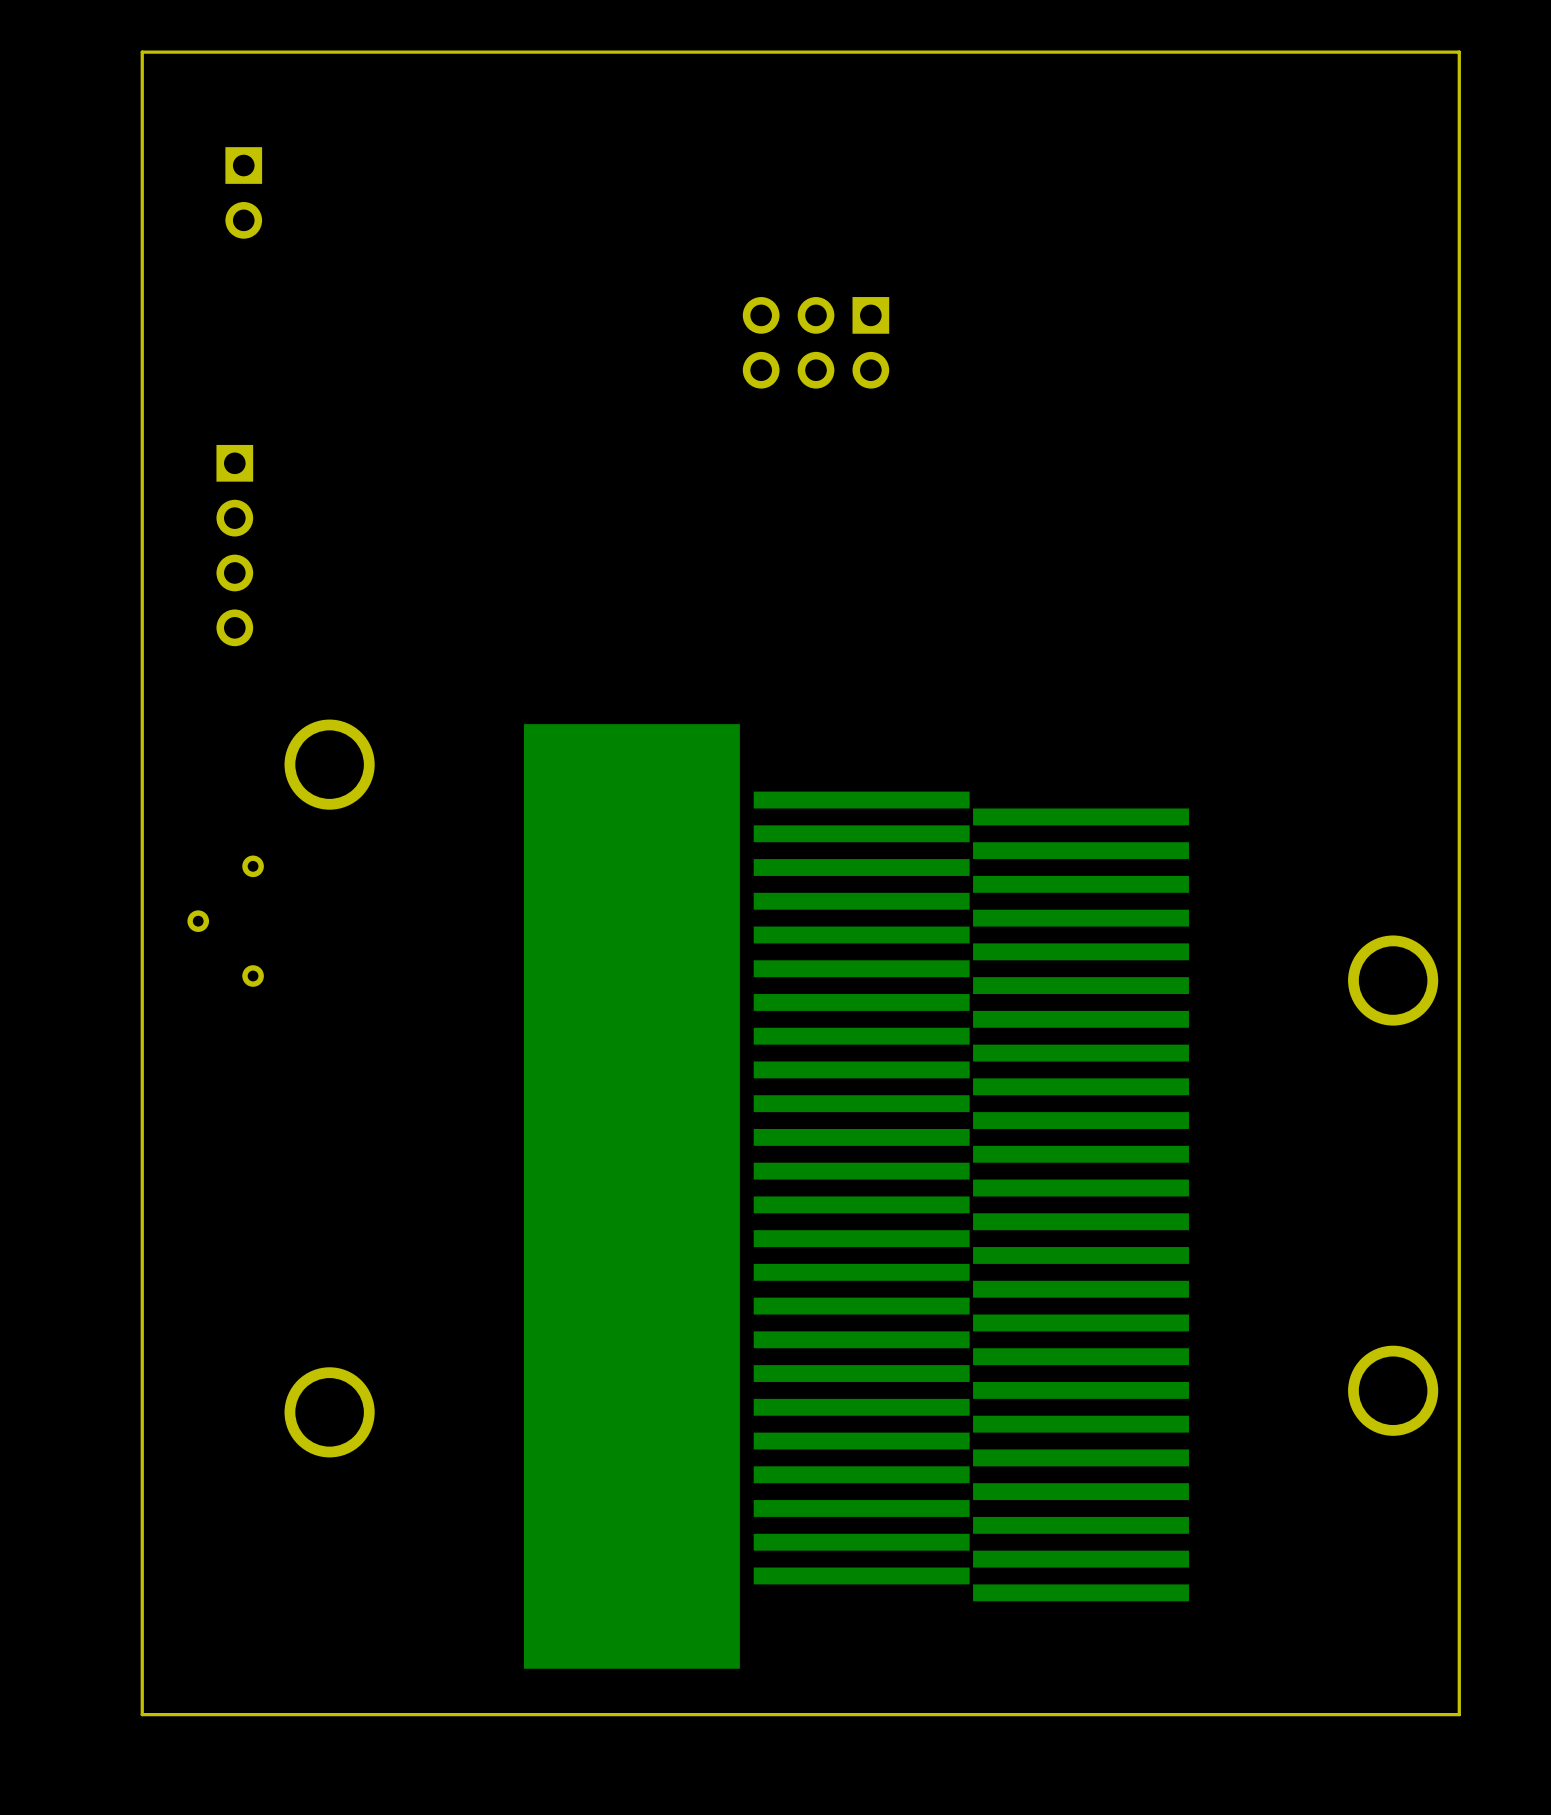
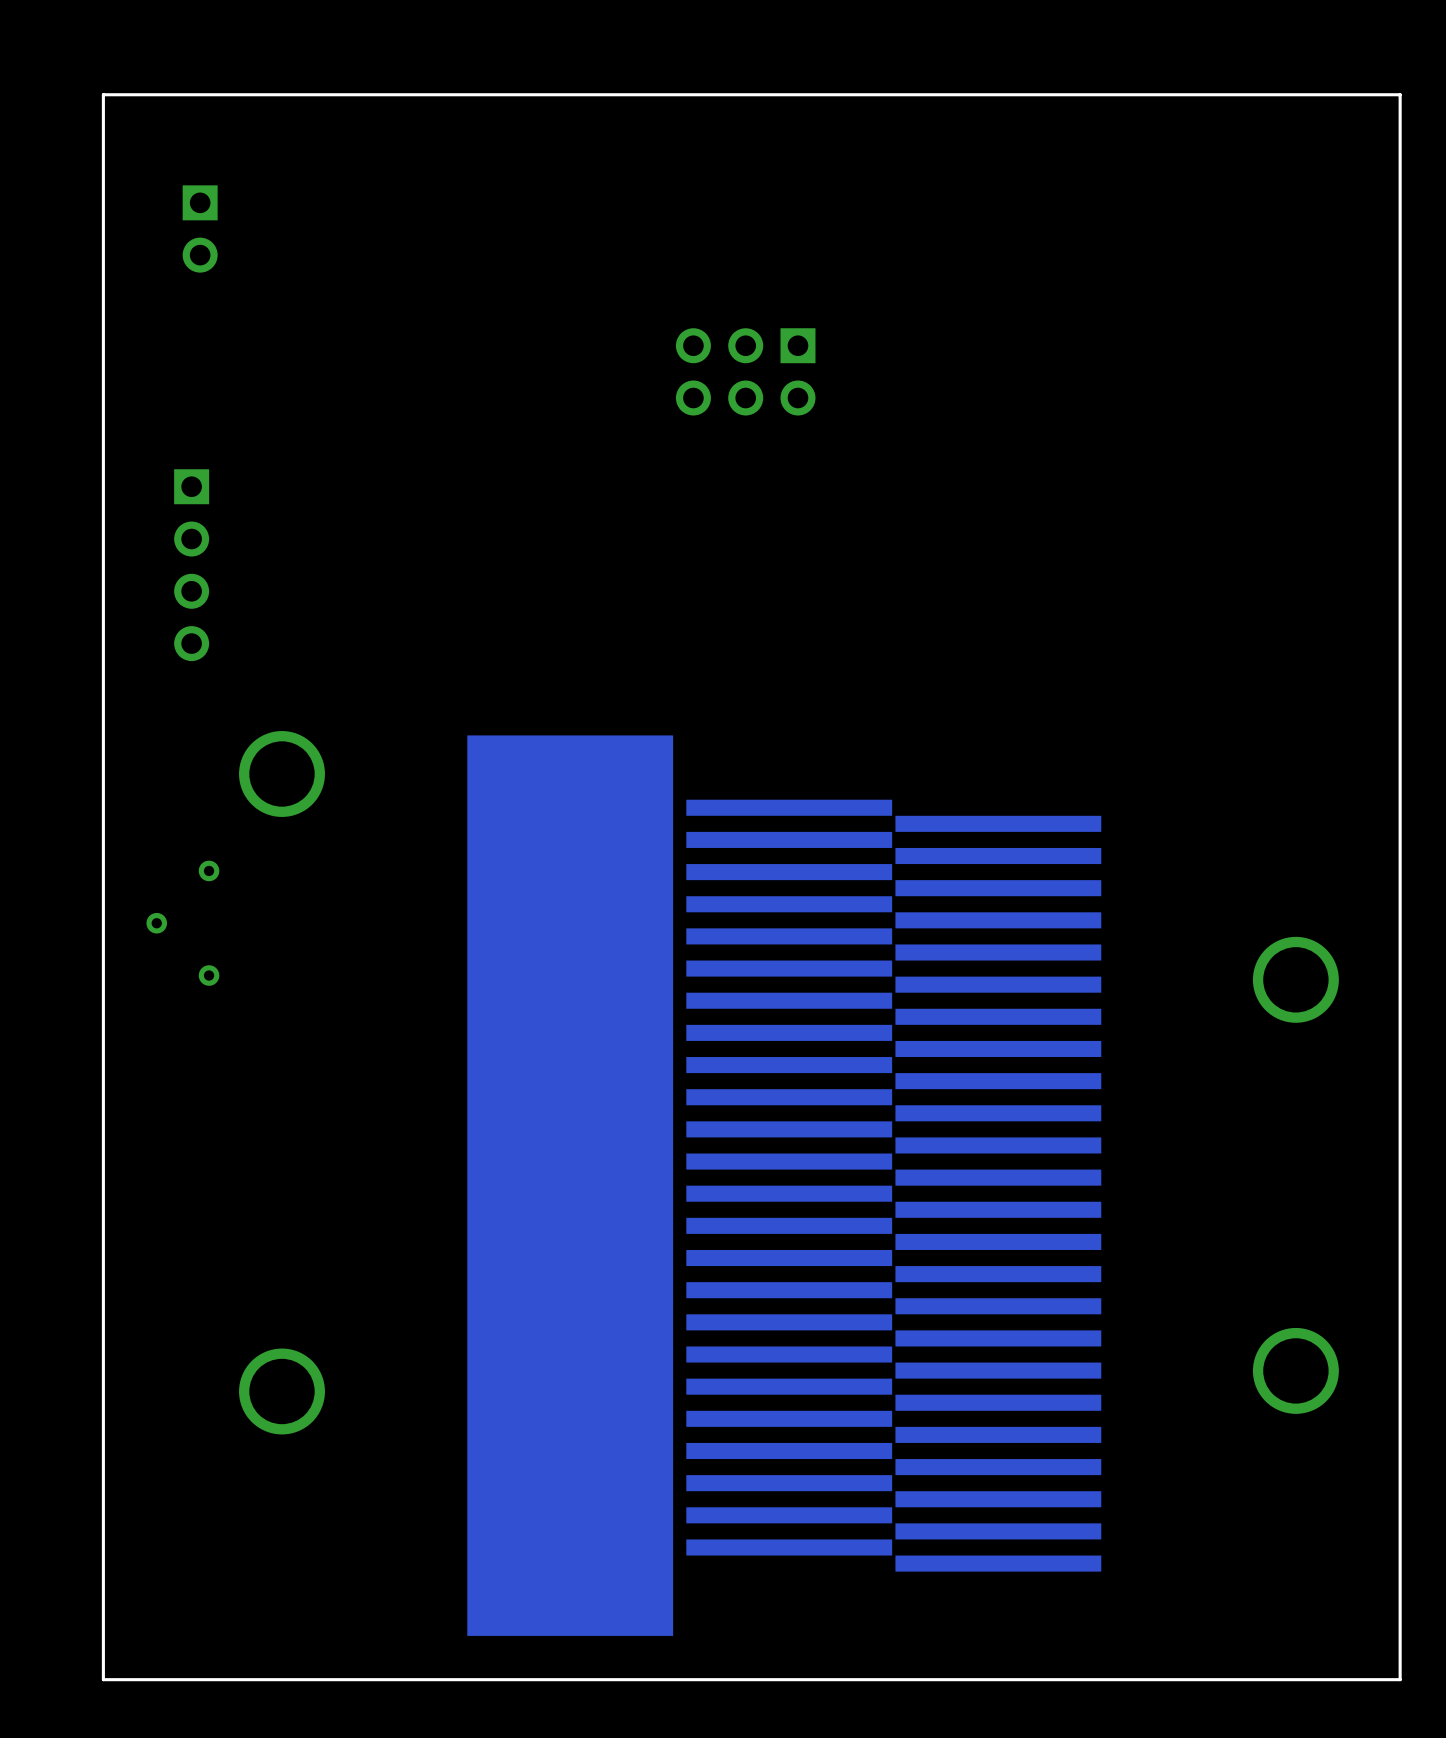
board edge: (1459, 52) (1459, 1714) -> (1358, 94) (1400, 94) (1400, 1679) (1358, 1679)

